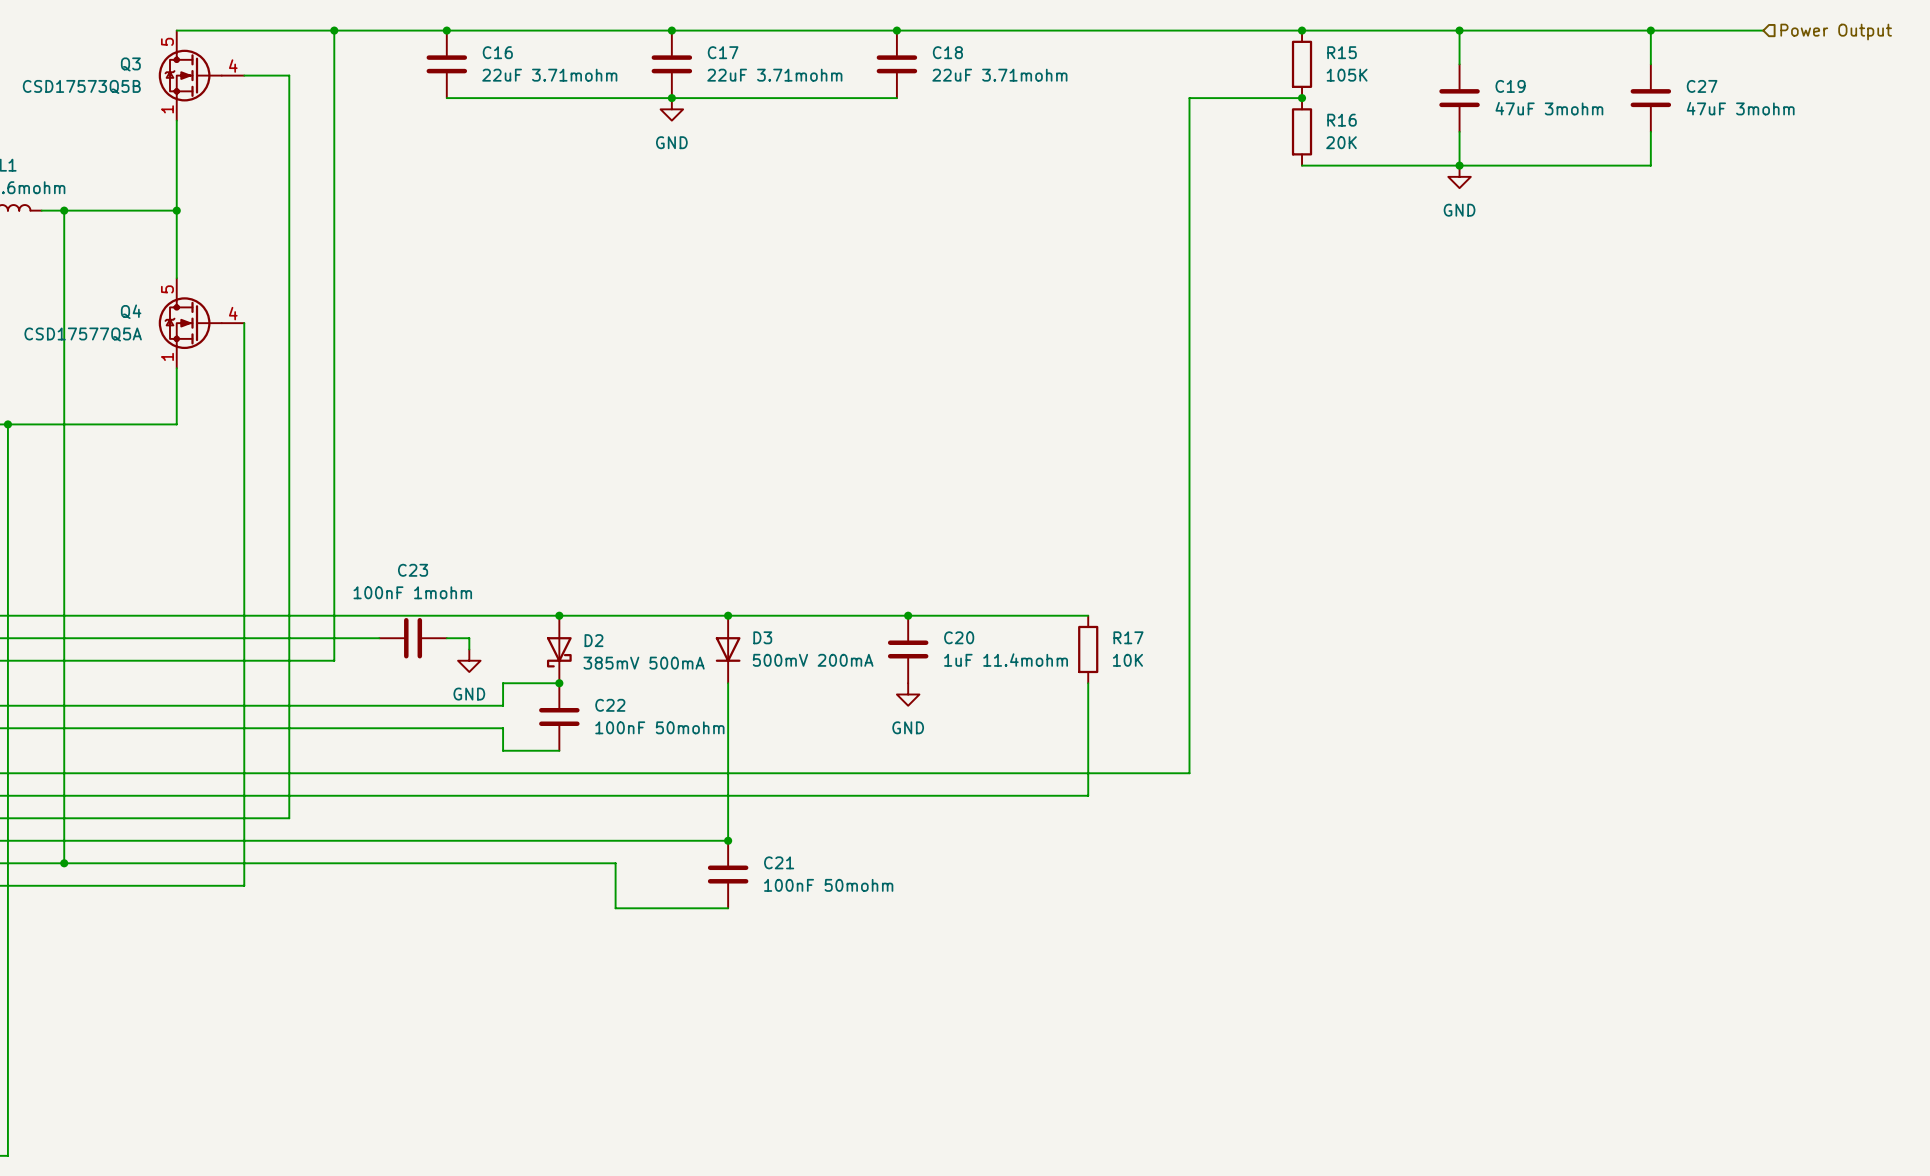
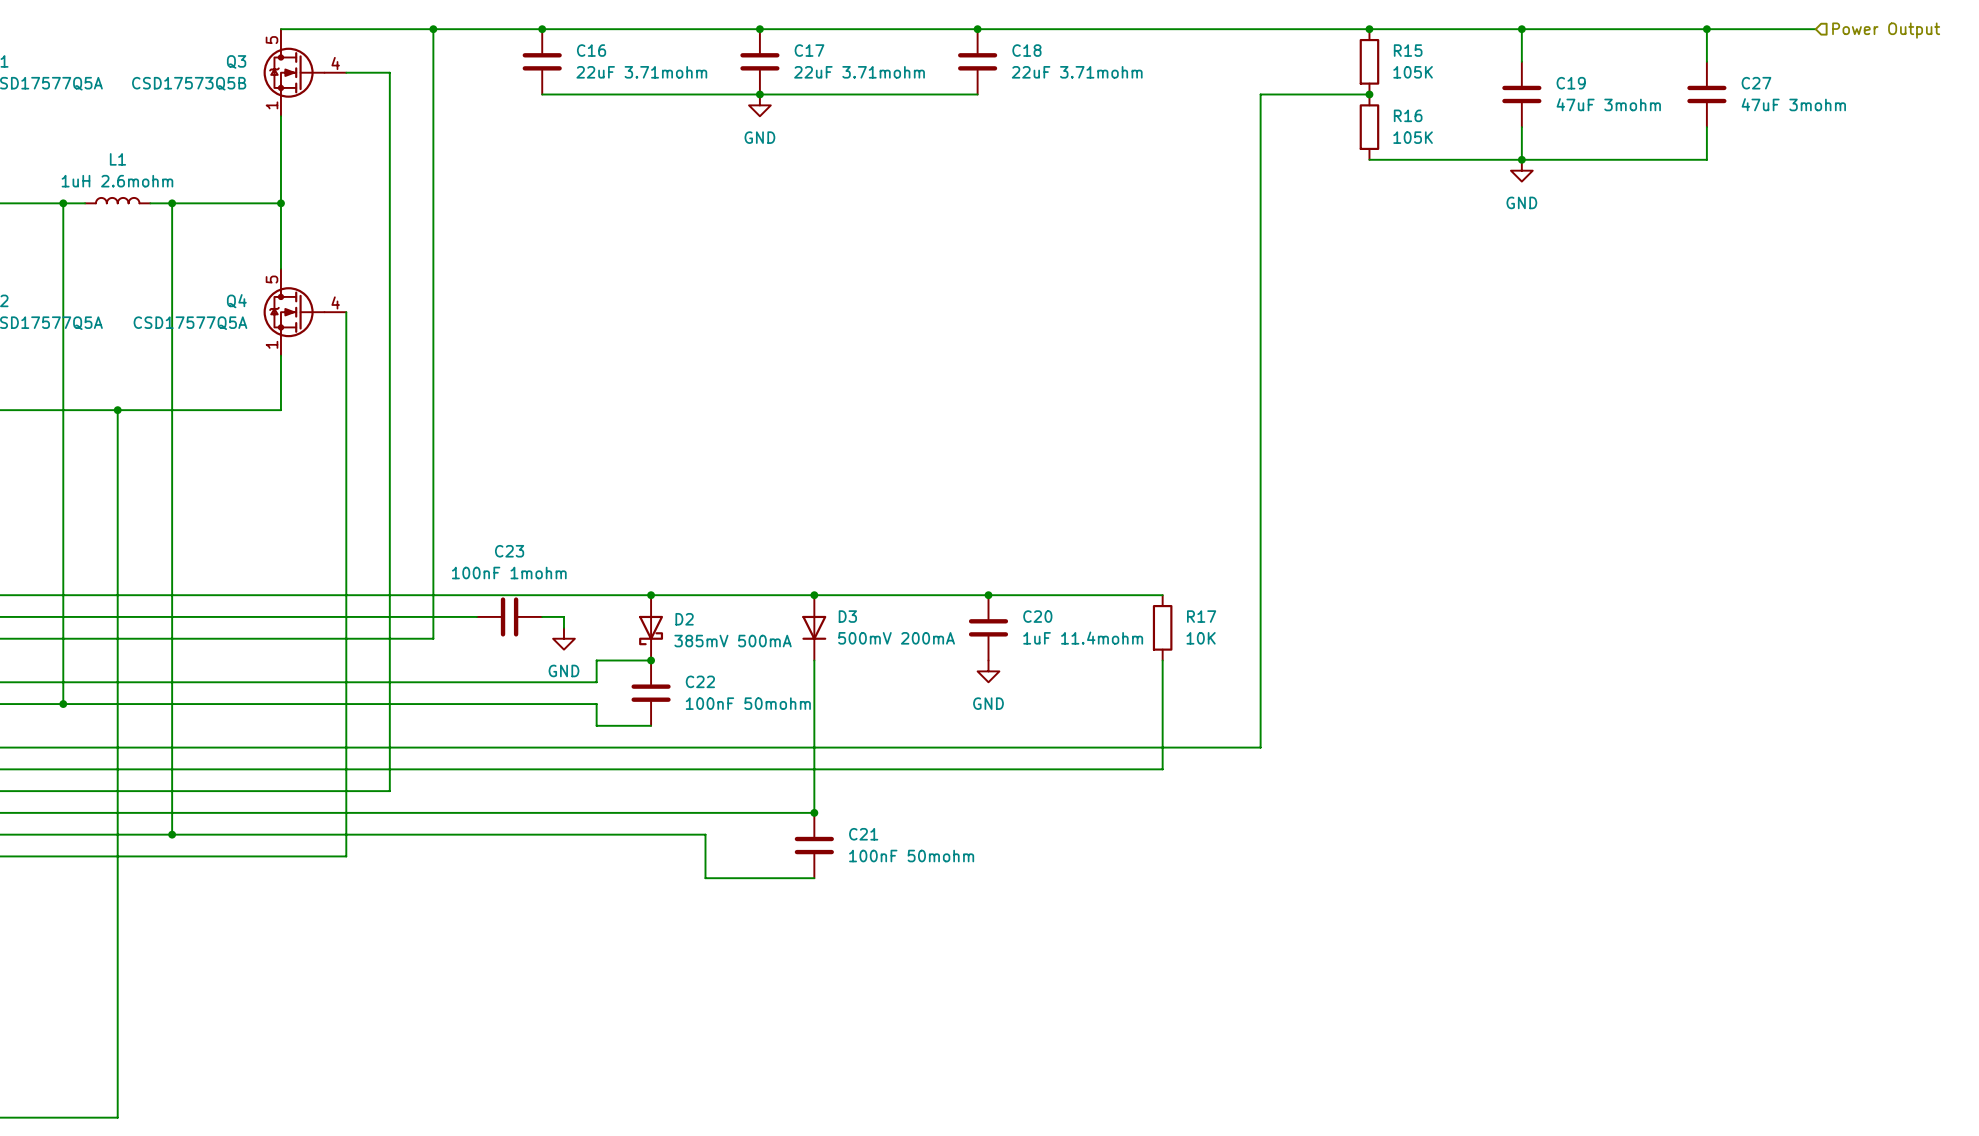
R16 value: 20K (1341, 142) -> 105K (1413, 137)

